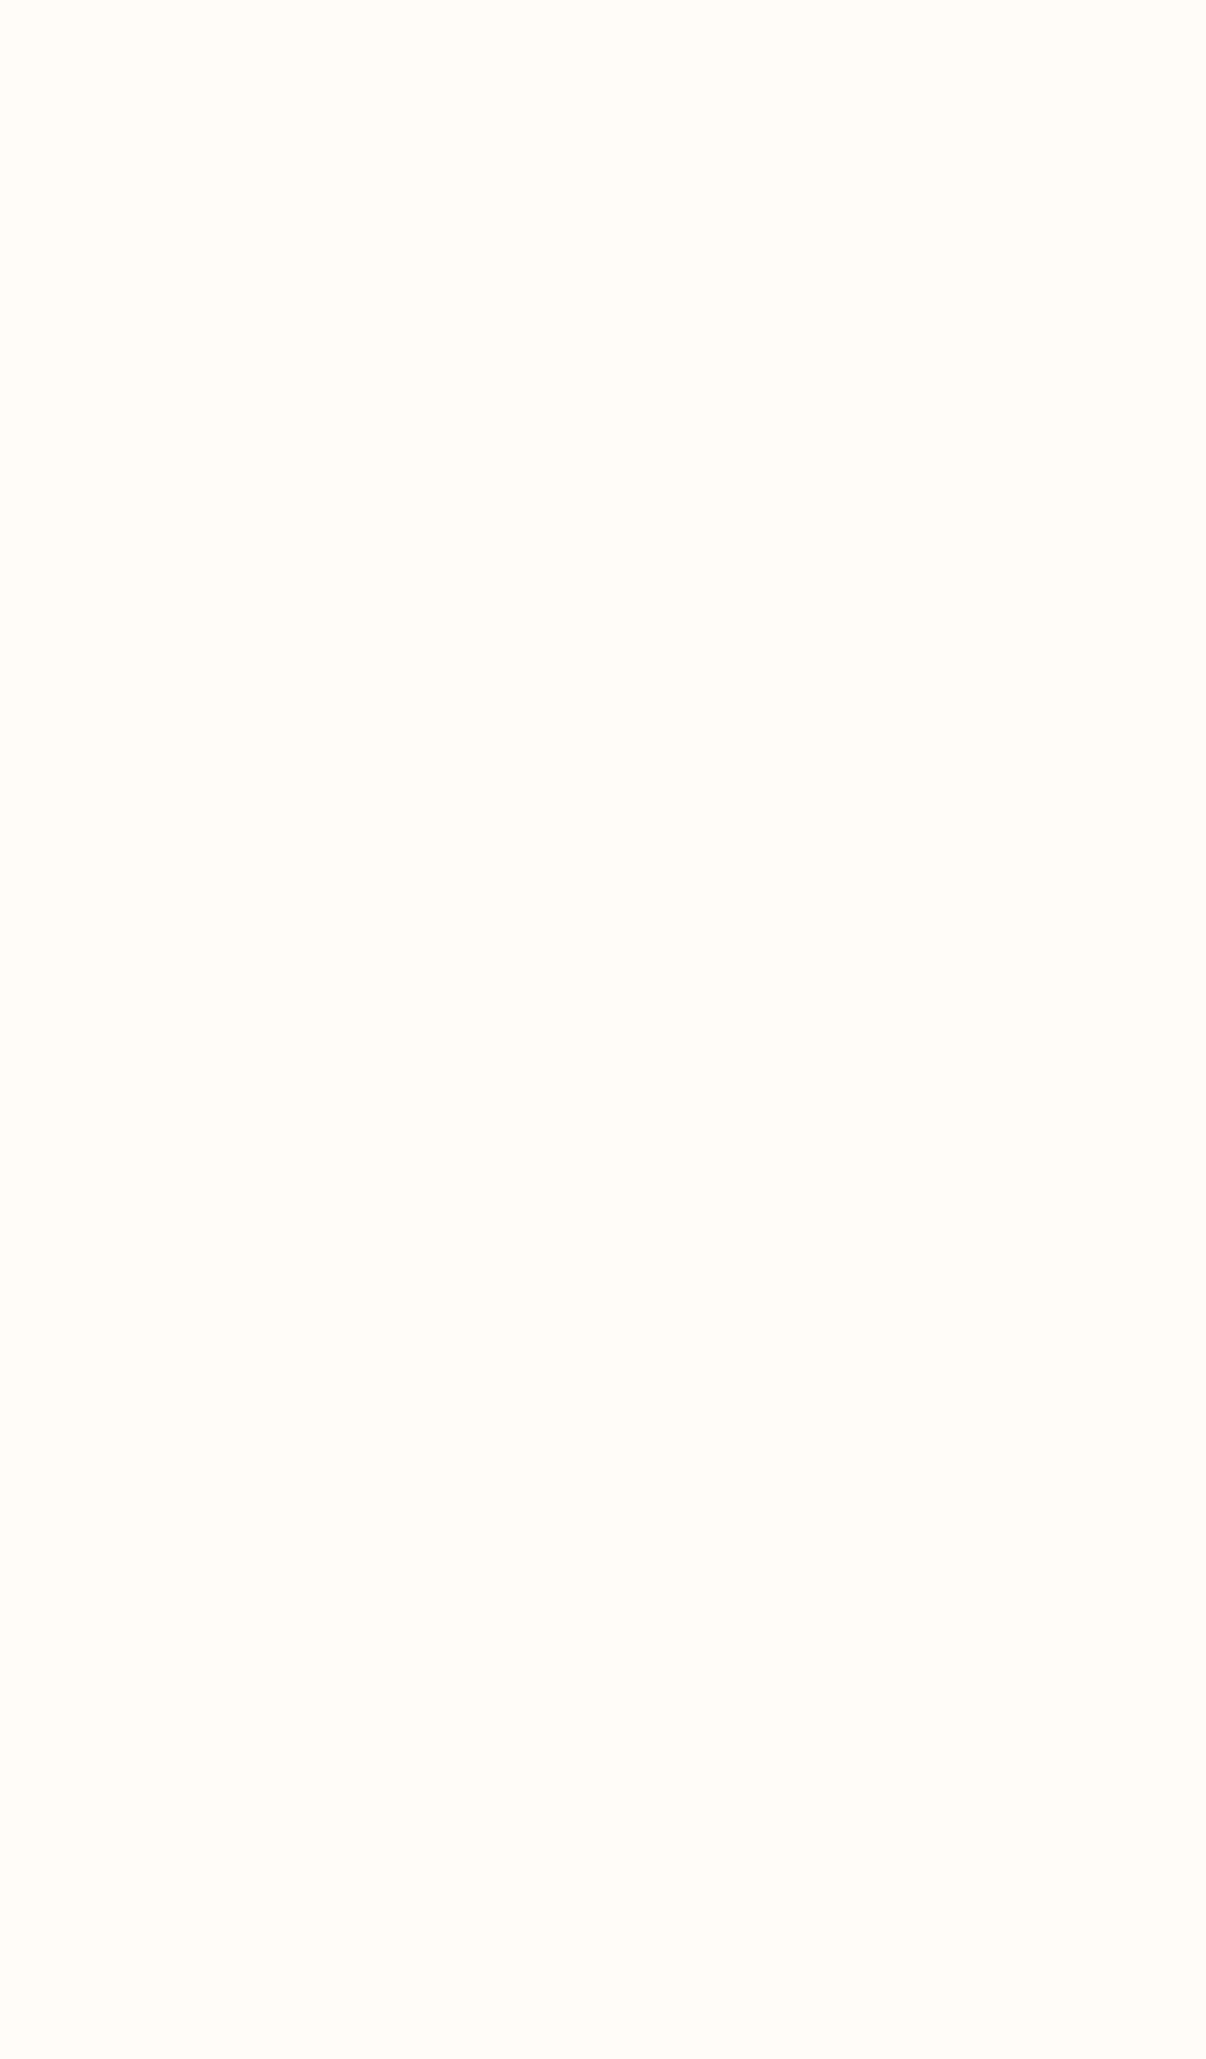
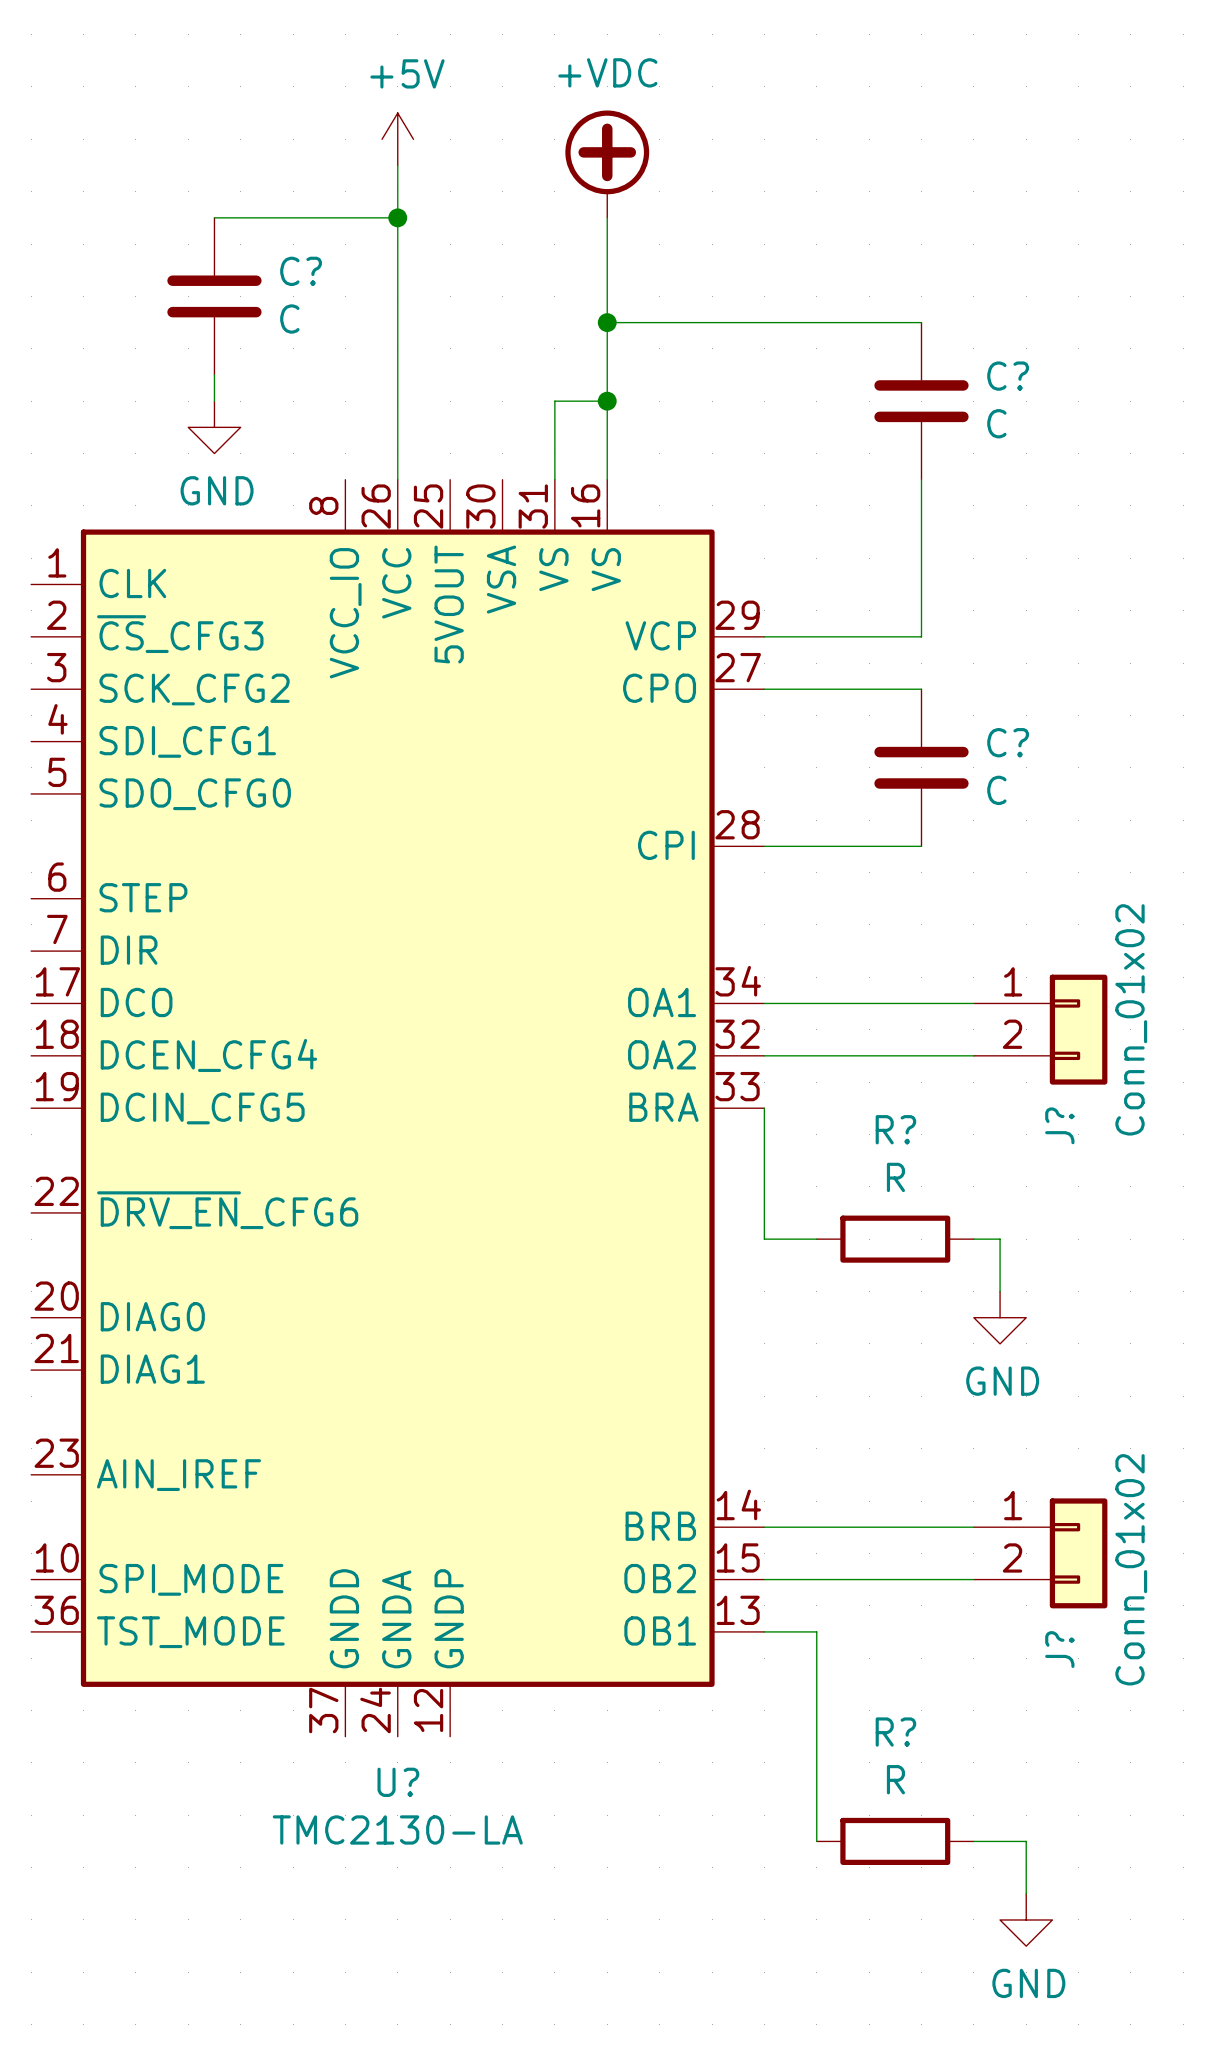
power symbol: none -> +5V (397, 139)
power symbol: none -> +VDC (607, 164)
wire: none -> (397, 165) (397, 479)
wire: none -> (214, 217) (397, 217)
junction: none -> (397, 217)
wire: none -> (607, 217) (607, 479)
C?: none -> C (214, 296)
wire: none -> (607, 322) (921, 322)
junction: none -> (607, 322)
wire: none -> (214, 374) (214, 401)
wire: none -> (607, 401) (554, 401) (554, 479)
junction: none -> (607, 401)
C?: none -> C (921, 401)
power symbol: none -> GND (214, 427)
wire: none -> (921, 479) (921, 636) (764, 636)
wire: none -> (764, 689) (921, 689)
C?: none -> C (921, 767)
wire: none -> (764, 846) (921, 846)
wire: none -> (764, 1003) (973, 1003)
J?: none -> Conn_01x02 (1040, 1029)
wire: none -> (764, 1055) (973, 1055)
U?: none -> TMC2130-LA (397, 1108)
wire: none -> (764, 1108) (764, 1239) (816, 1239)
R?: none -> R (895, 1239)
wire: none -> (973, 1239) (1000, 1239) (1000, 1291)
power symbol: none -> GND (1000, 1317)
wire: none -> (764, 1527) (973, 1527)
J?: none -> Conn_01x02 (1040, 1553)
wire: none -> (764, 1579) (973, 1579)
wire: none -> (764, 1631) (816, 1631) (816, 1841)
R?: none -> R (895, 1841)
wire: none -> (973, 1841) (1026, 1841) (1026, 1893)
power symbol: none -> GND (1026, 1919)

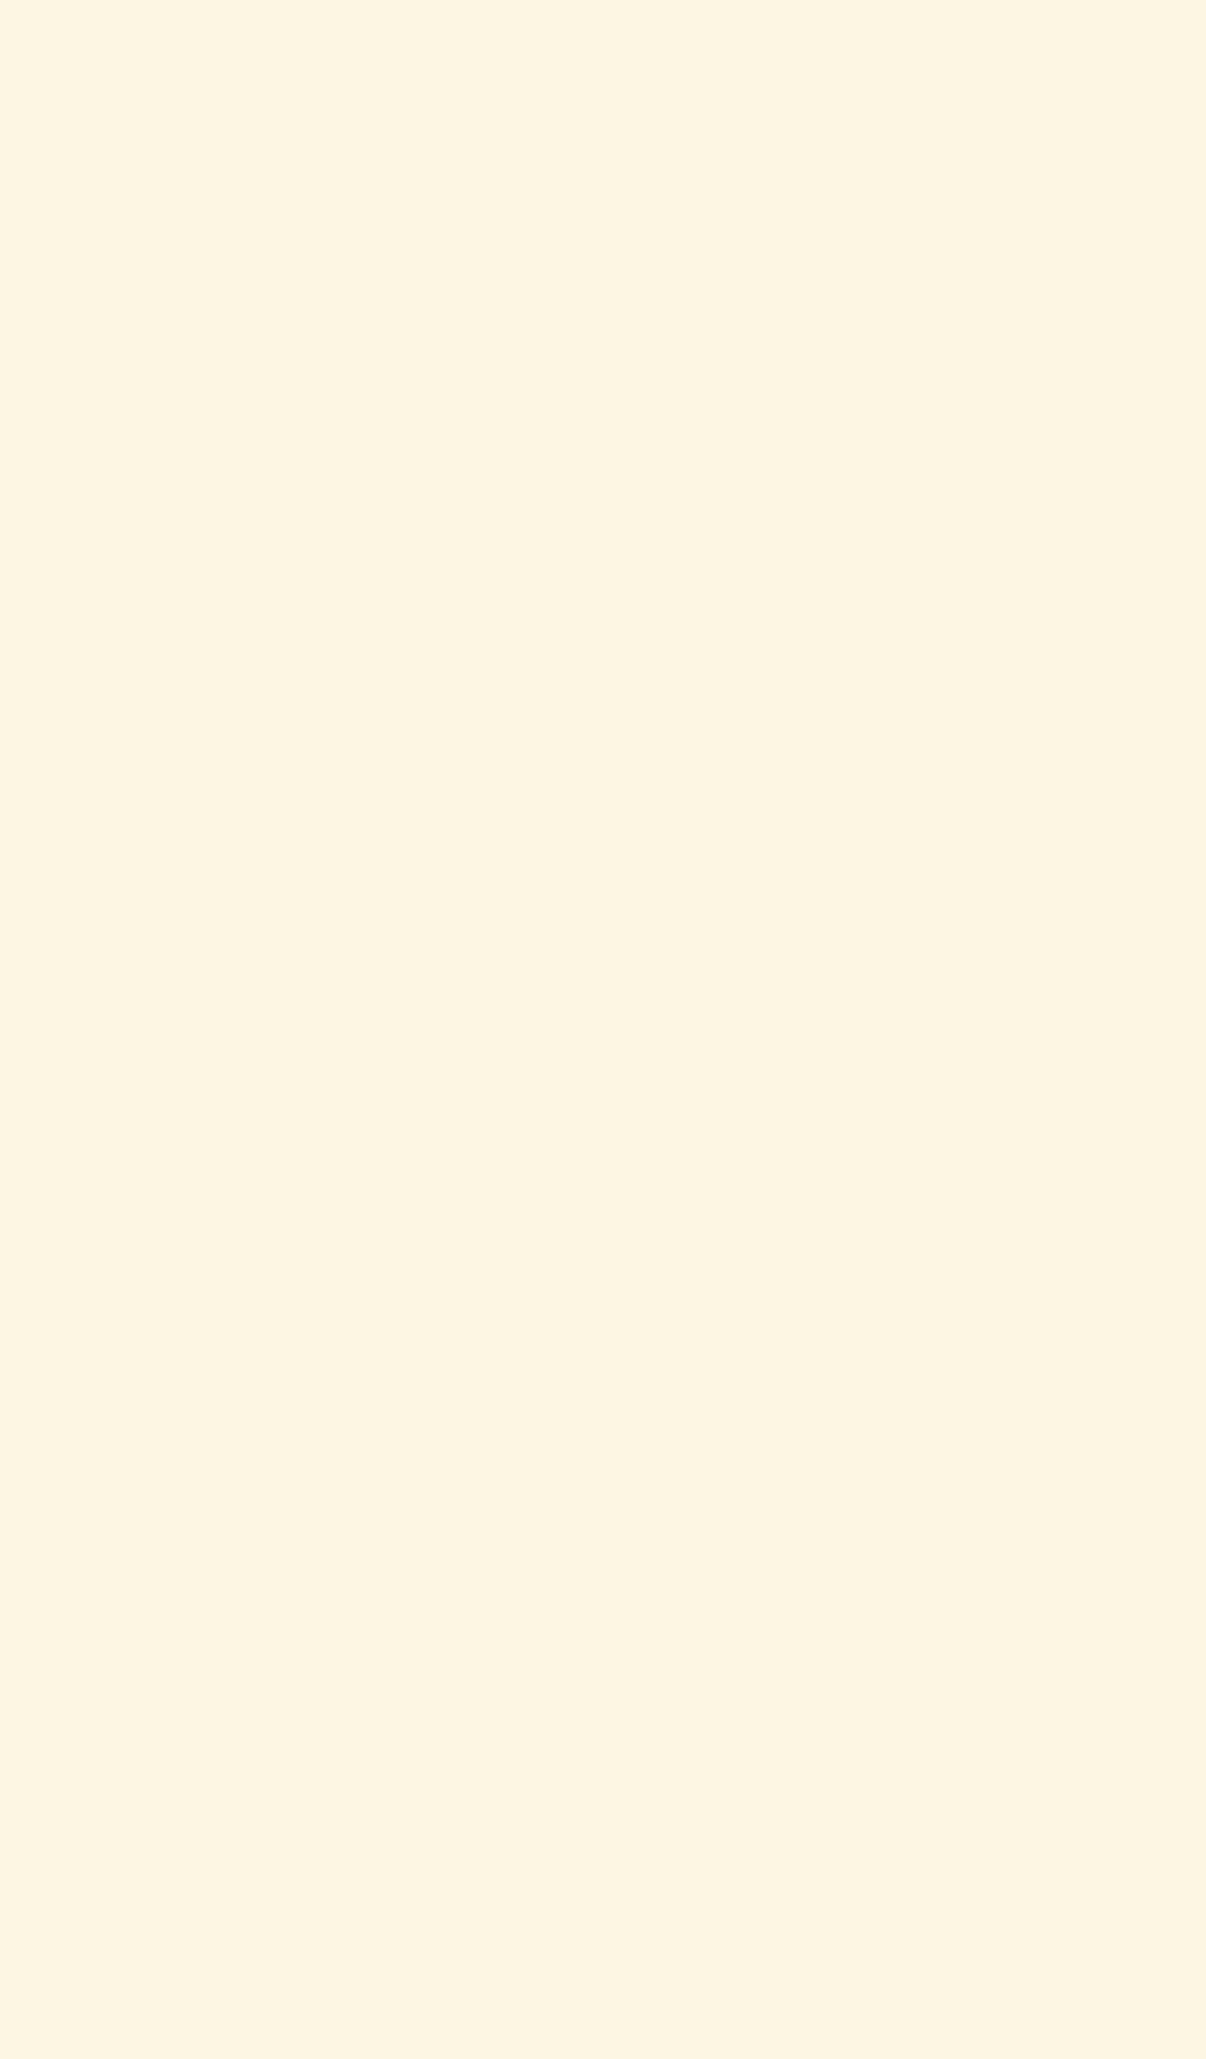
power symbol: +5V (397, 139) -> none
power symbol: +VDC (607, 164) -> none
wire: (397, 165) (397, 479) -> none
wire: (214, 217) (397, 217) -> none
junction: (397, 217) -> none
wire: (607, 217) (607, 479) -> none
C?: C (214, 296) -> none
wire: (607, 322) (921, 322) -> none
junction: (607, 322) -> none
wire: (214, 374) (214, 401) -> none
wire: (607, 401) (554, 401) (554, 479) -> none
junction: (607, 401) -> none
C?: C (921, 401) -> none
power symbol: GND (214, 427) -> none
wire: (921, 479) (921, 636) (764, 636) -> none
wire: (764, 689) (921, 689) -> none
C?: C (921, 767) -> none
wire: (764, 846) (921, 846) -> none
wire: (764, 1003) (973, 1003) -> none
J?: Conn_01x02 (1040, 1029) -> none
wire: (764, 1055) (973, 1055) -> none
U?: TMC2130-LA (397, 1108) -> none
wire: (764, 1108) (764, 1239) (816, 1239) -> none
R?: R (895, 1239) -> none
wire: (973, 1239) (1000, 1239) (1000, 1291) -> none
power symbol: GND (1000, 1317) -> none
wire: (764, 1527) (973, 1527) -> none
J?: Conn_01x02 (1040, 1553) -> none
wire: (764, 1579) (973, 1579) -> none
wire: (764, 1631) (816, 1631) (816, 1841) -> none
R?: R (895, 1841) -> none
wire: (973, 1841) (1026, 1841) (1026, 1893) -> none
power symbol: GND (1026, 1919) -> none

